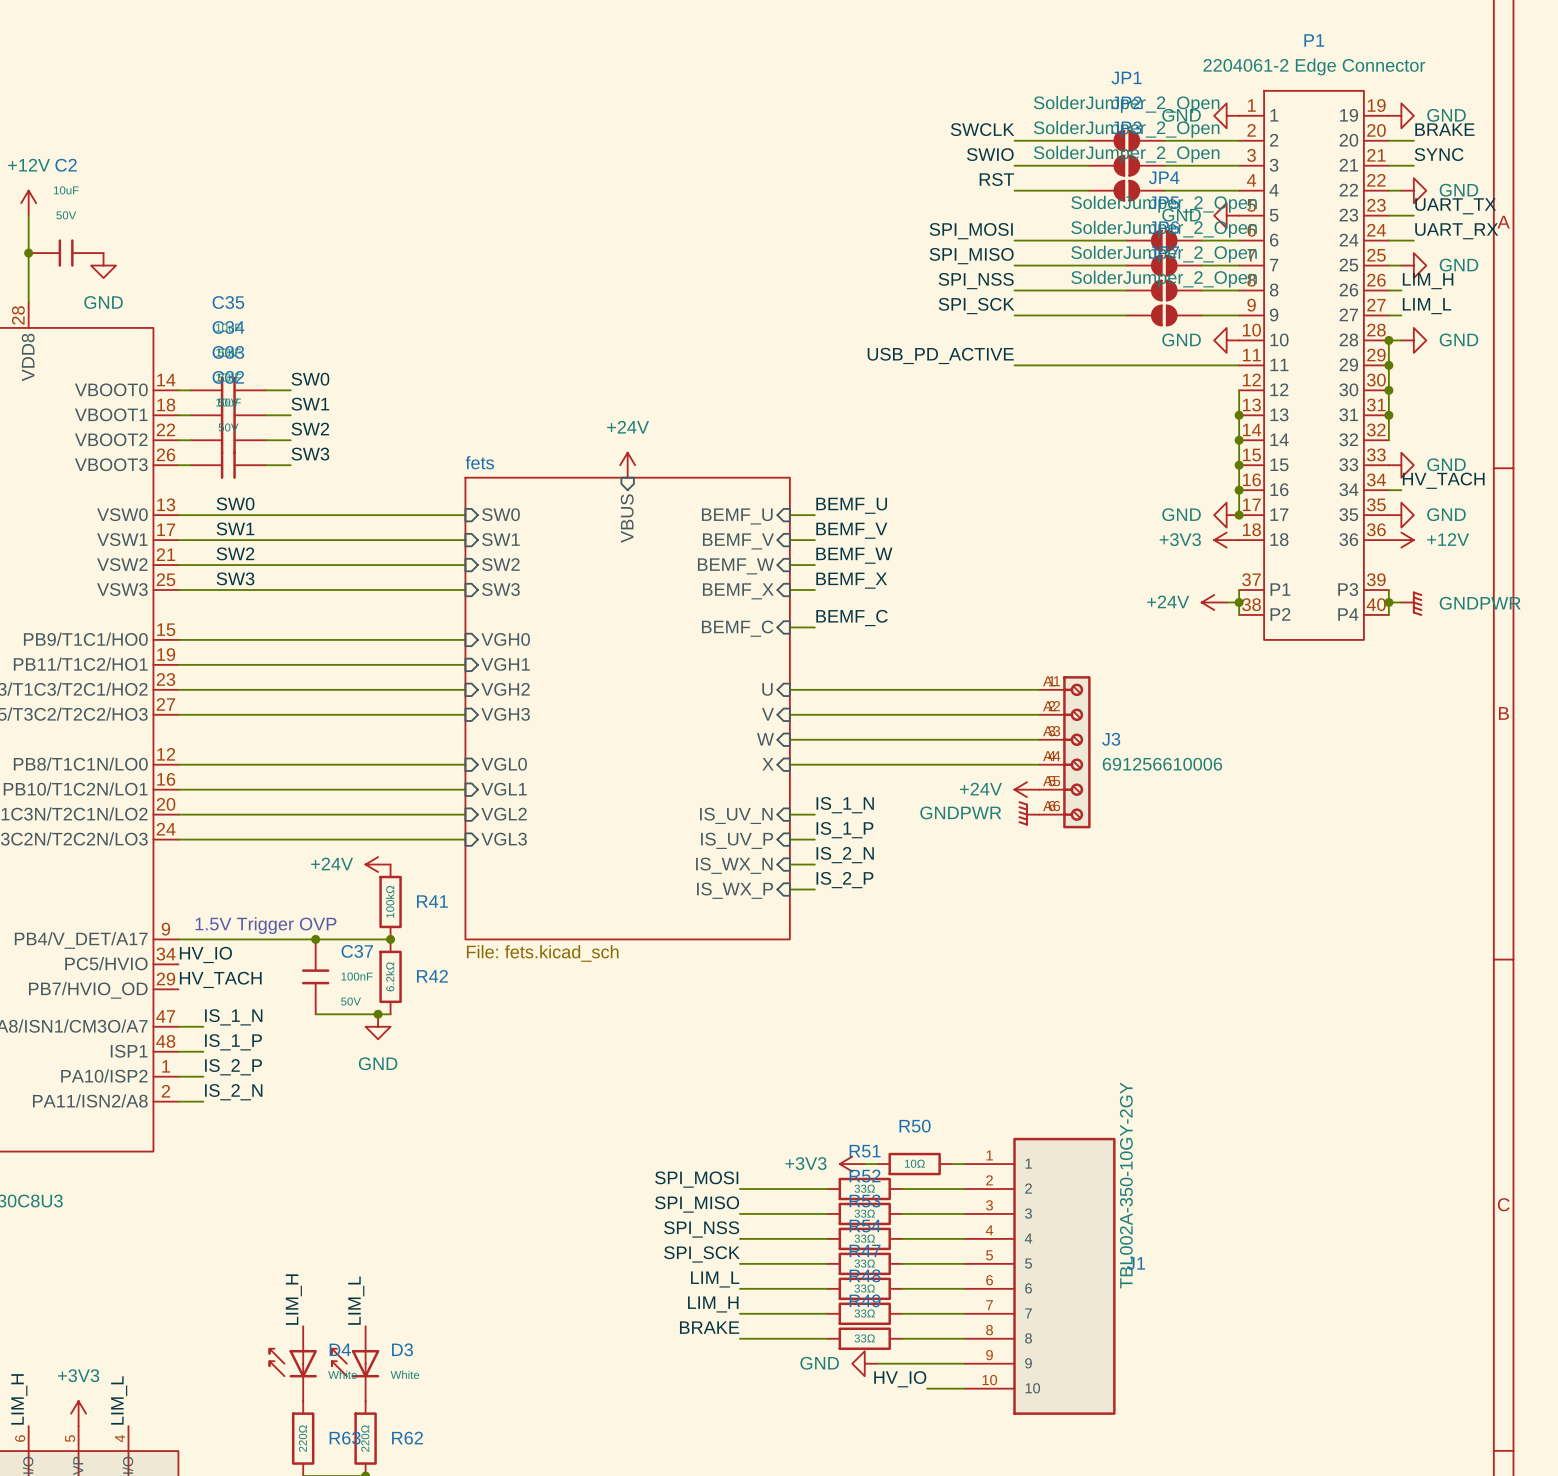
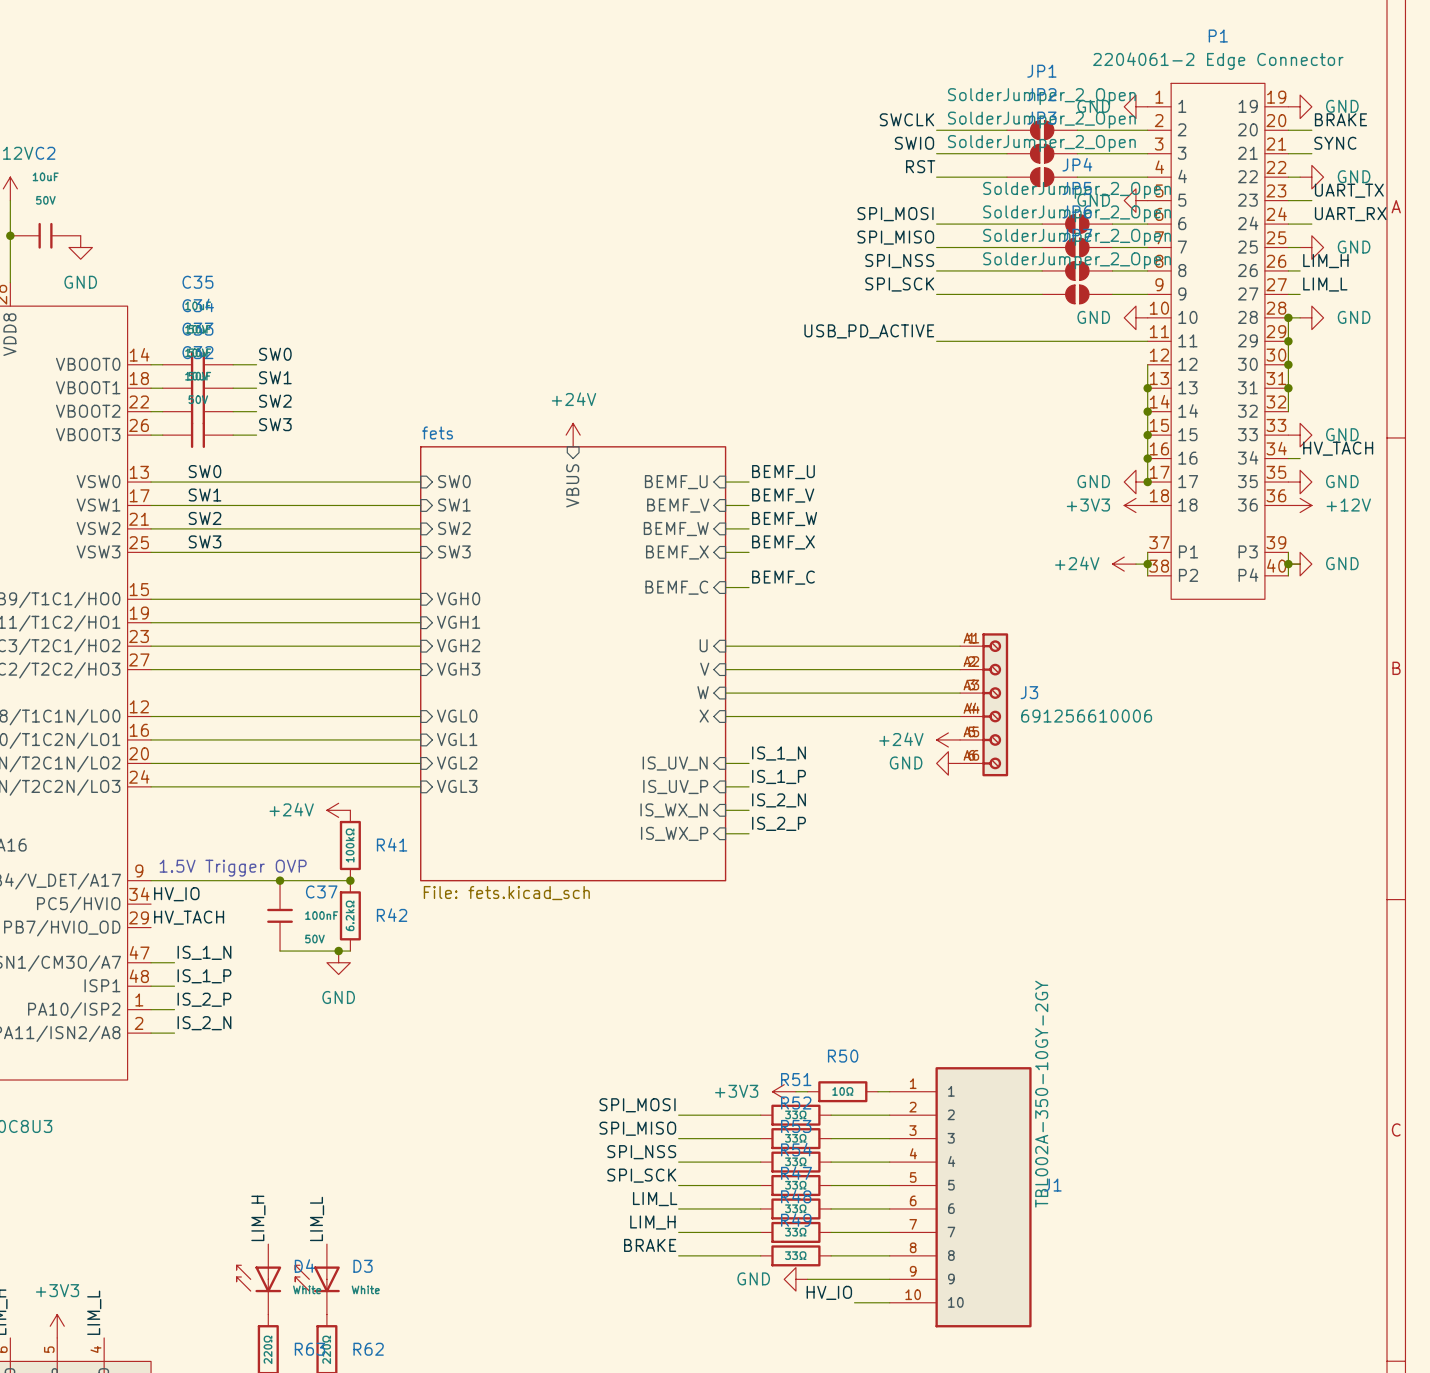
power symbol: none -> GND (1300, 564)
power symbol: GNDPWR (1411, 603) -> none
power symbol: GNDPWR (1028, 813) -> GND (948, 763)

